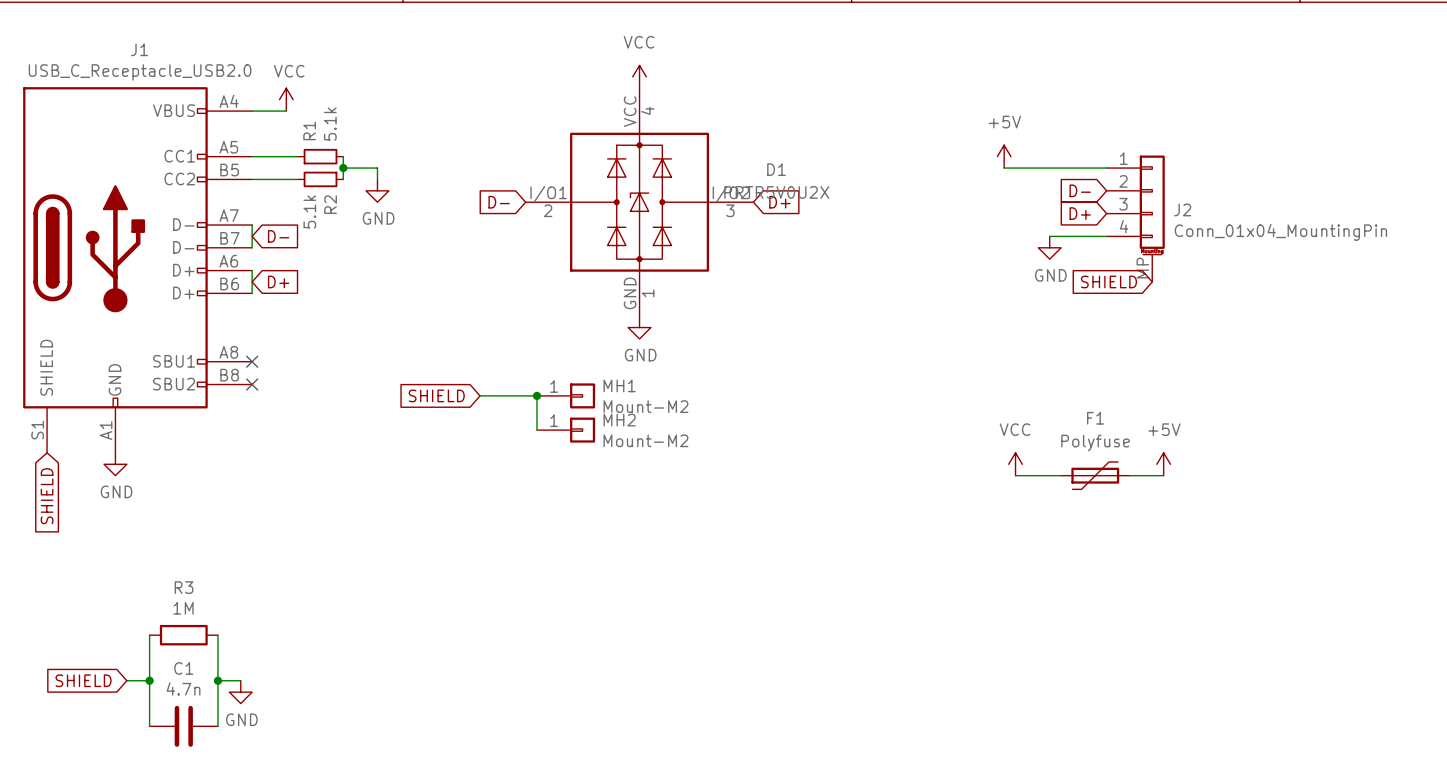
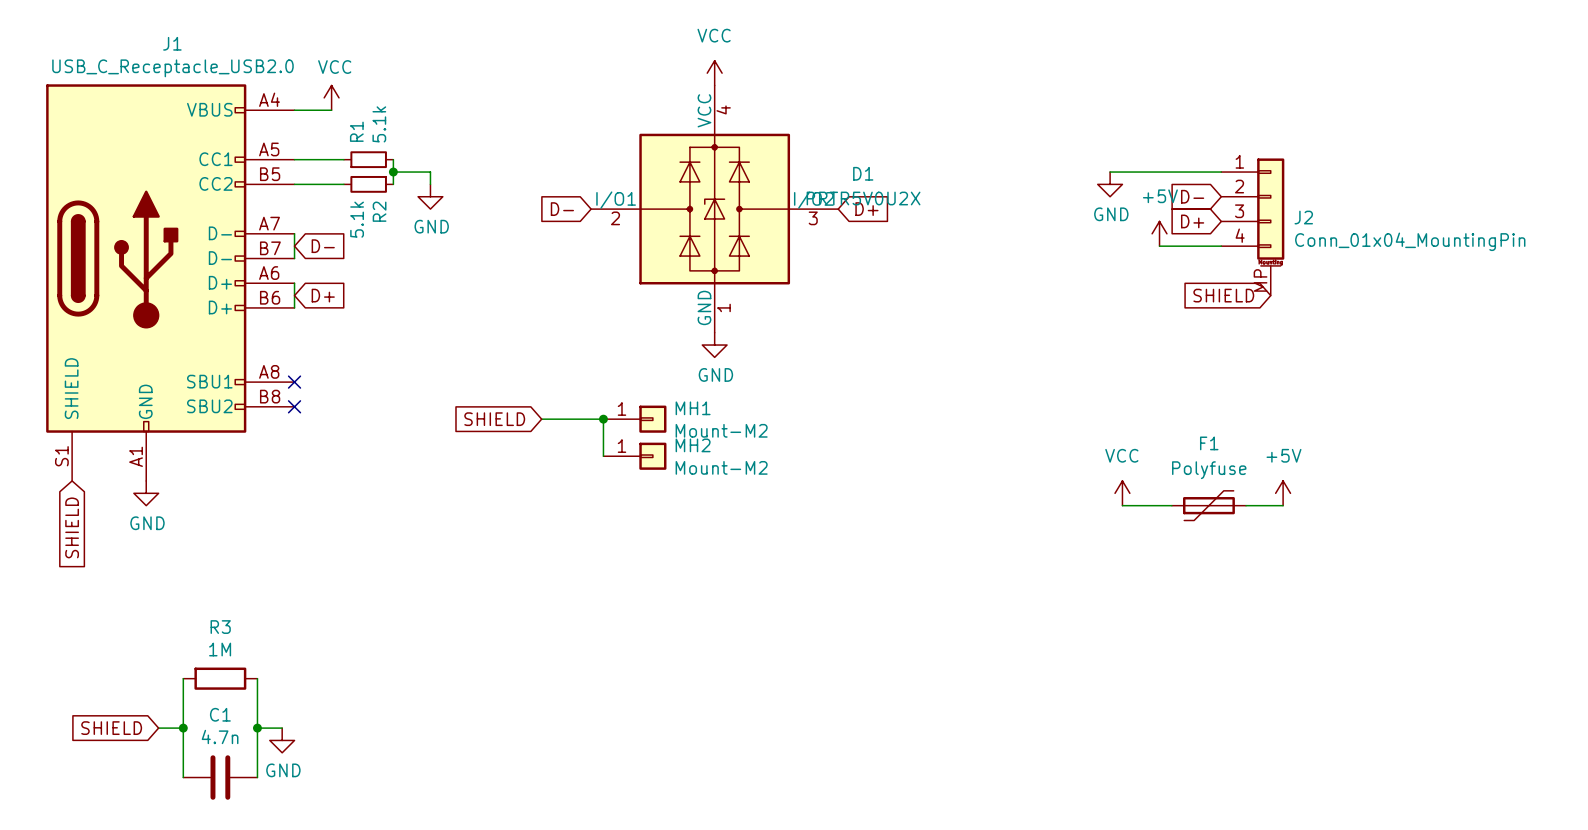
power symbol position: +5V (1004, 156) -> +5V (1159, 233)
power symbol position: GND (1049, 247) -> GND (1110, 184)

